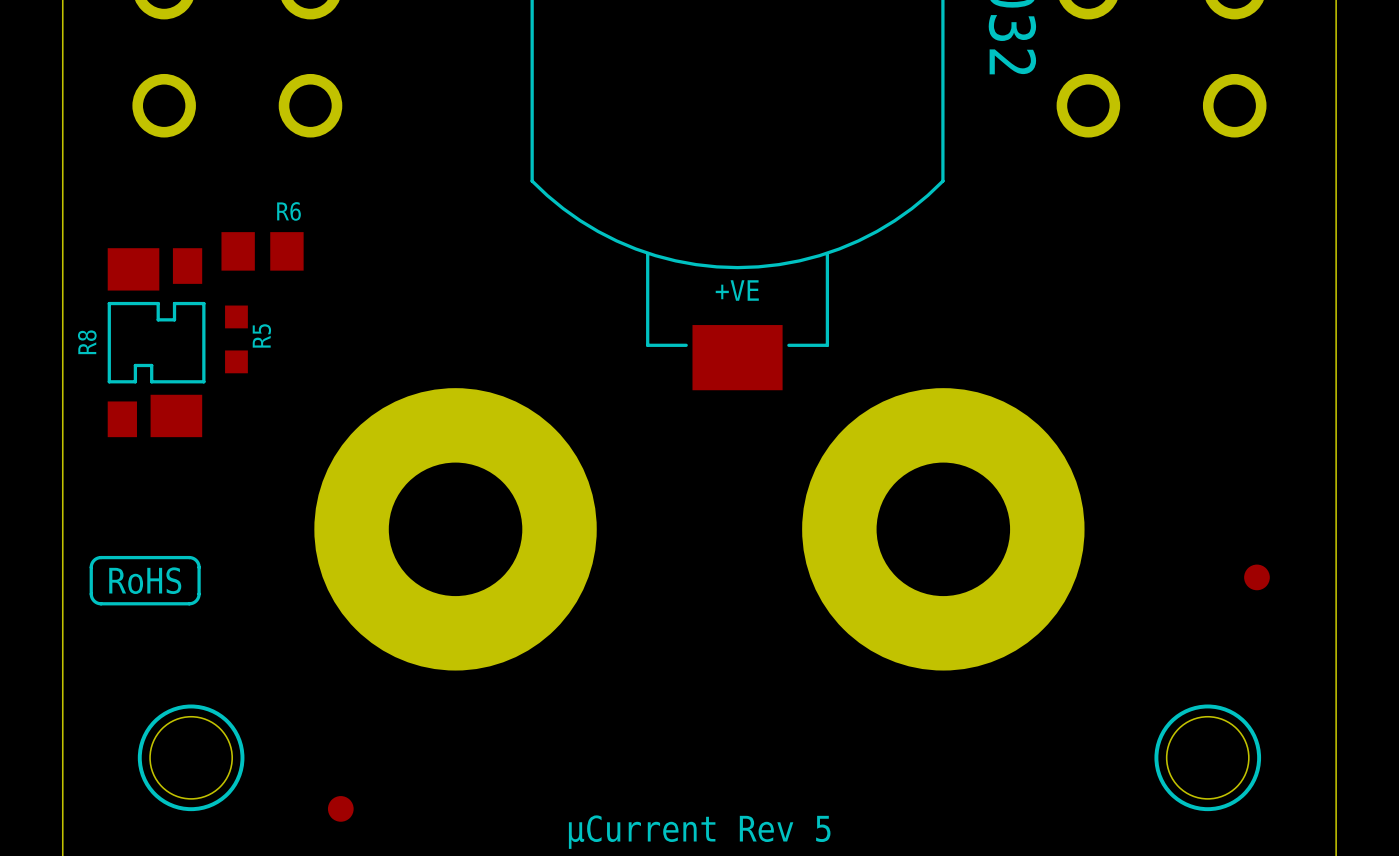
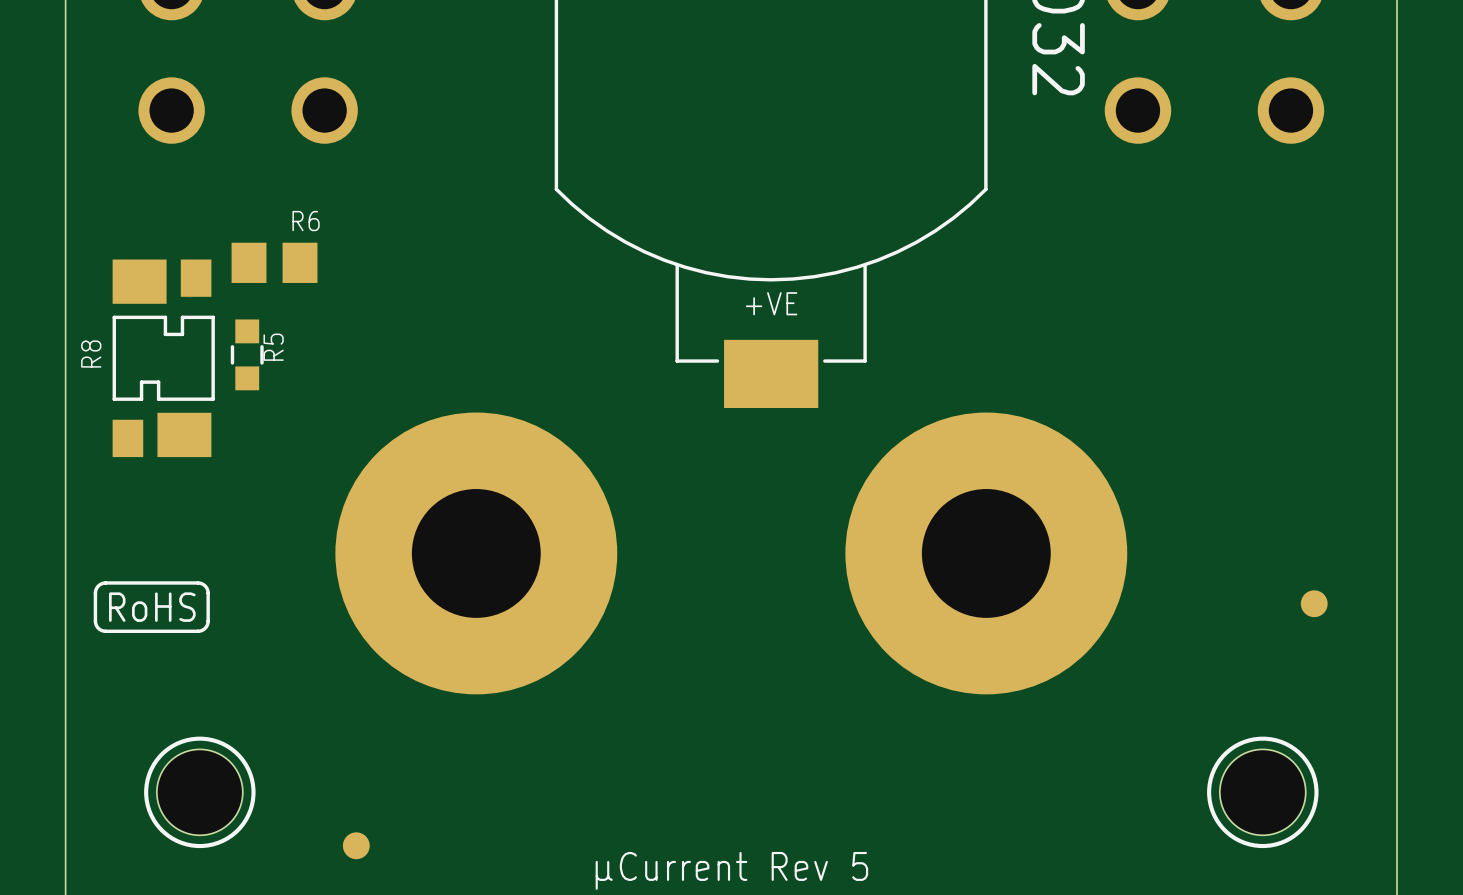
R5 footprint: [225, 305, 248, 374] -> [230, 319, 264, 391]
part footprint: [314, 388, 597, 671] -> [335, 412, 618, 695]
part footprint: [802, 388, 1085, 671] -> [845, 412, 1128, 695]

